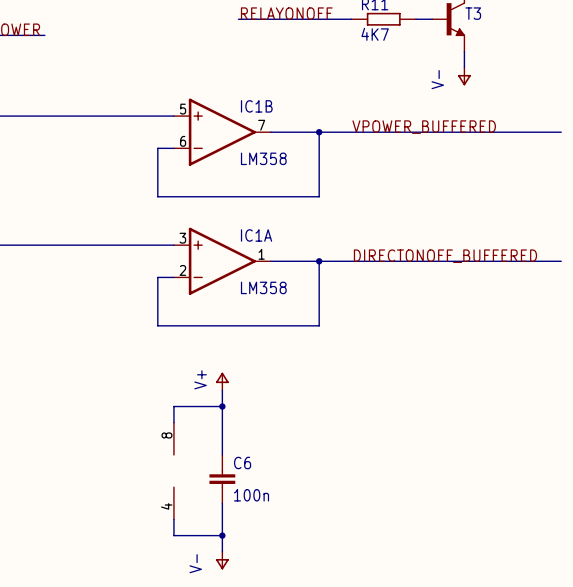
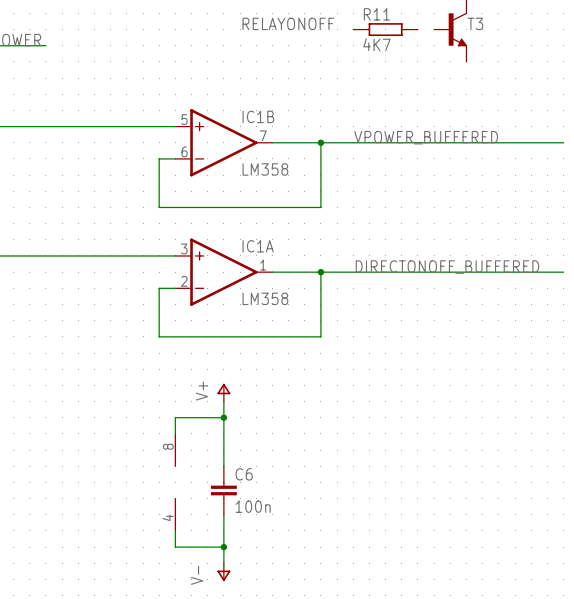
wire: (238, 19) (351, 19) -> none
wire: (416, 19) (432, 19) -> none
wire: (464, 51) (464, 67) -> none
power symbol: V- (464, 76) -> none

